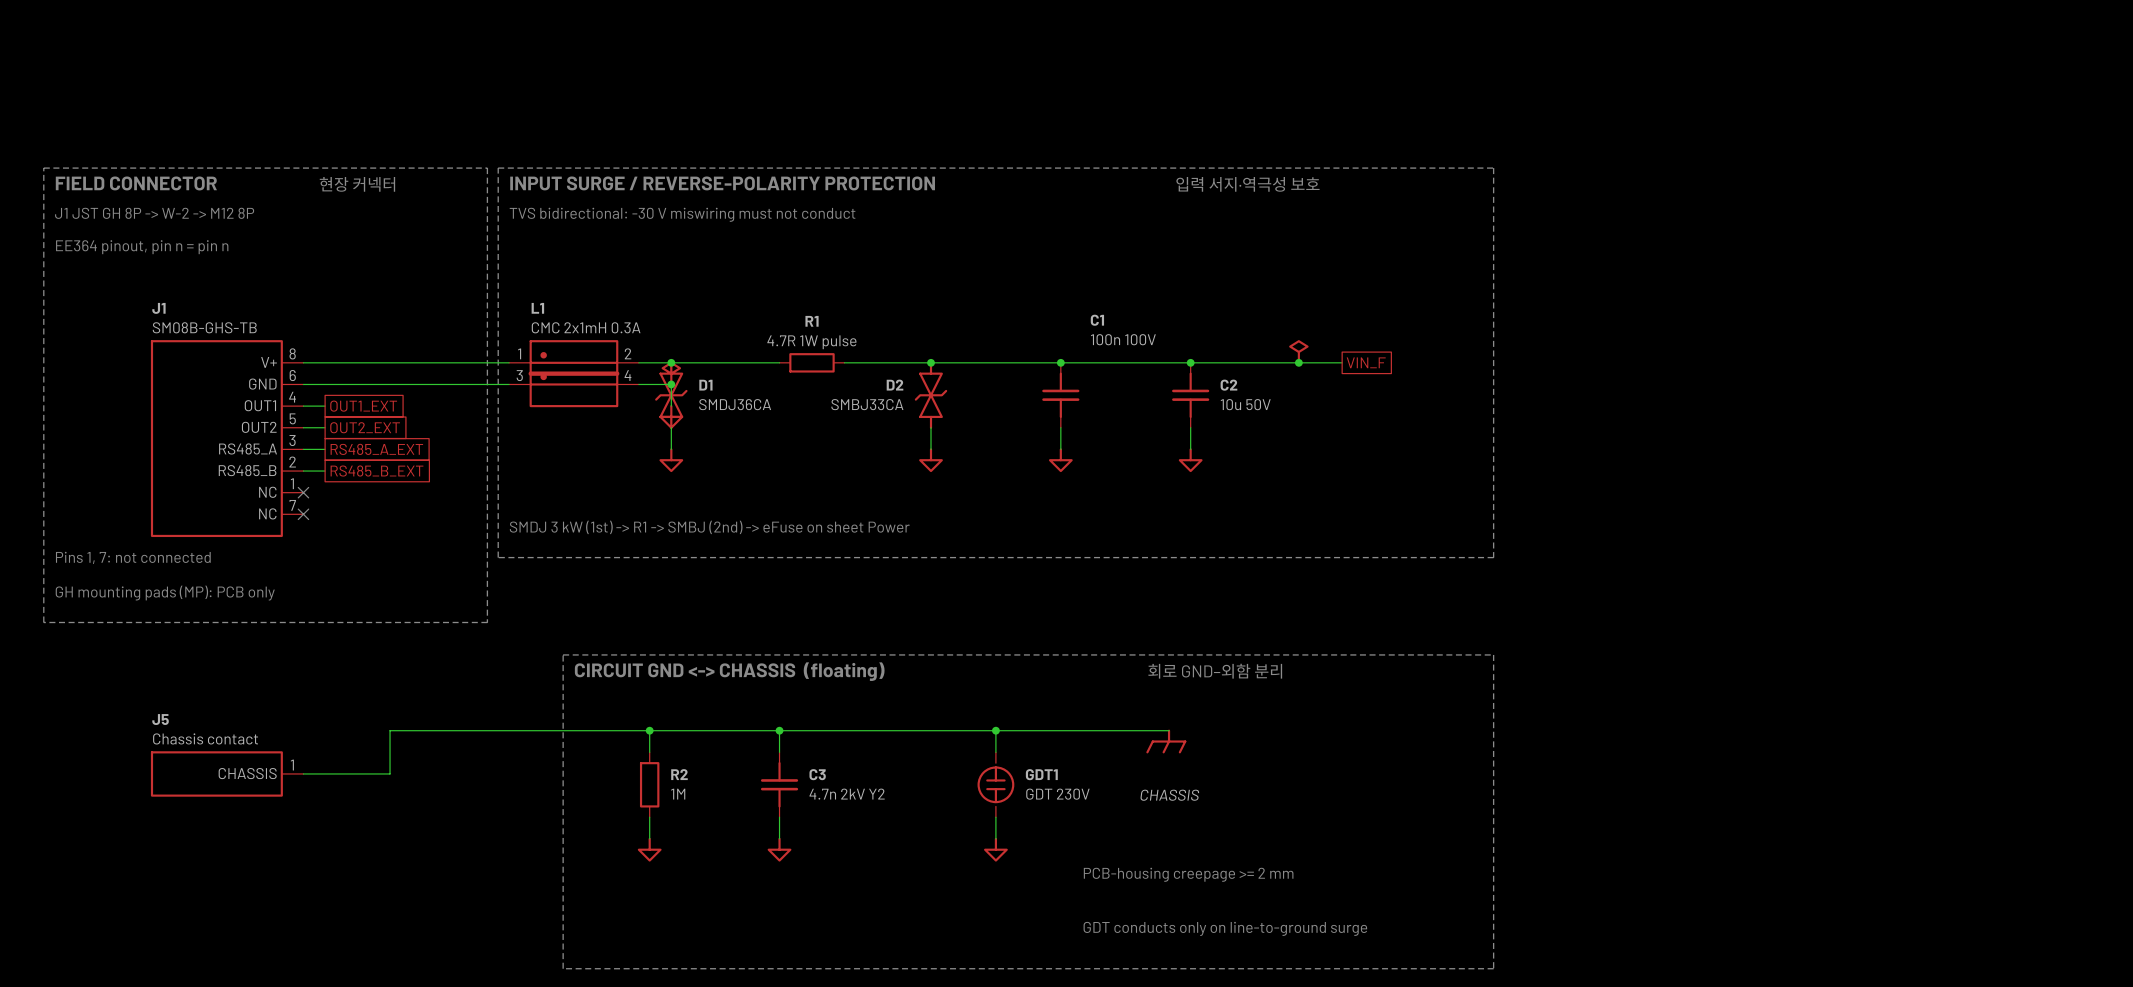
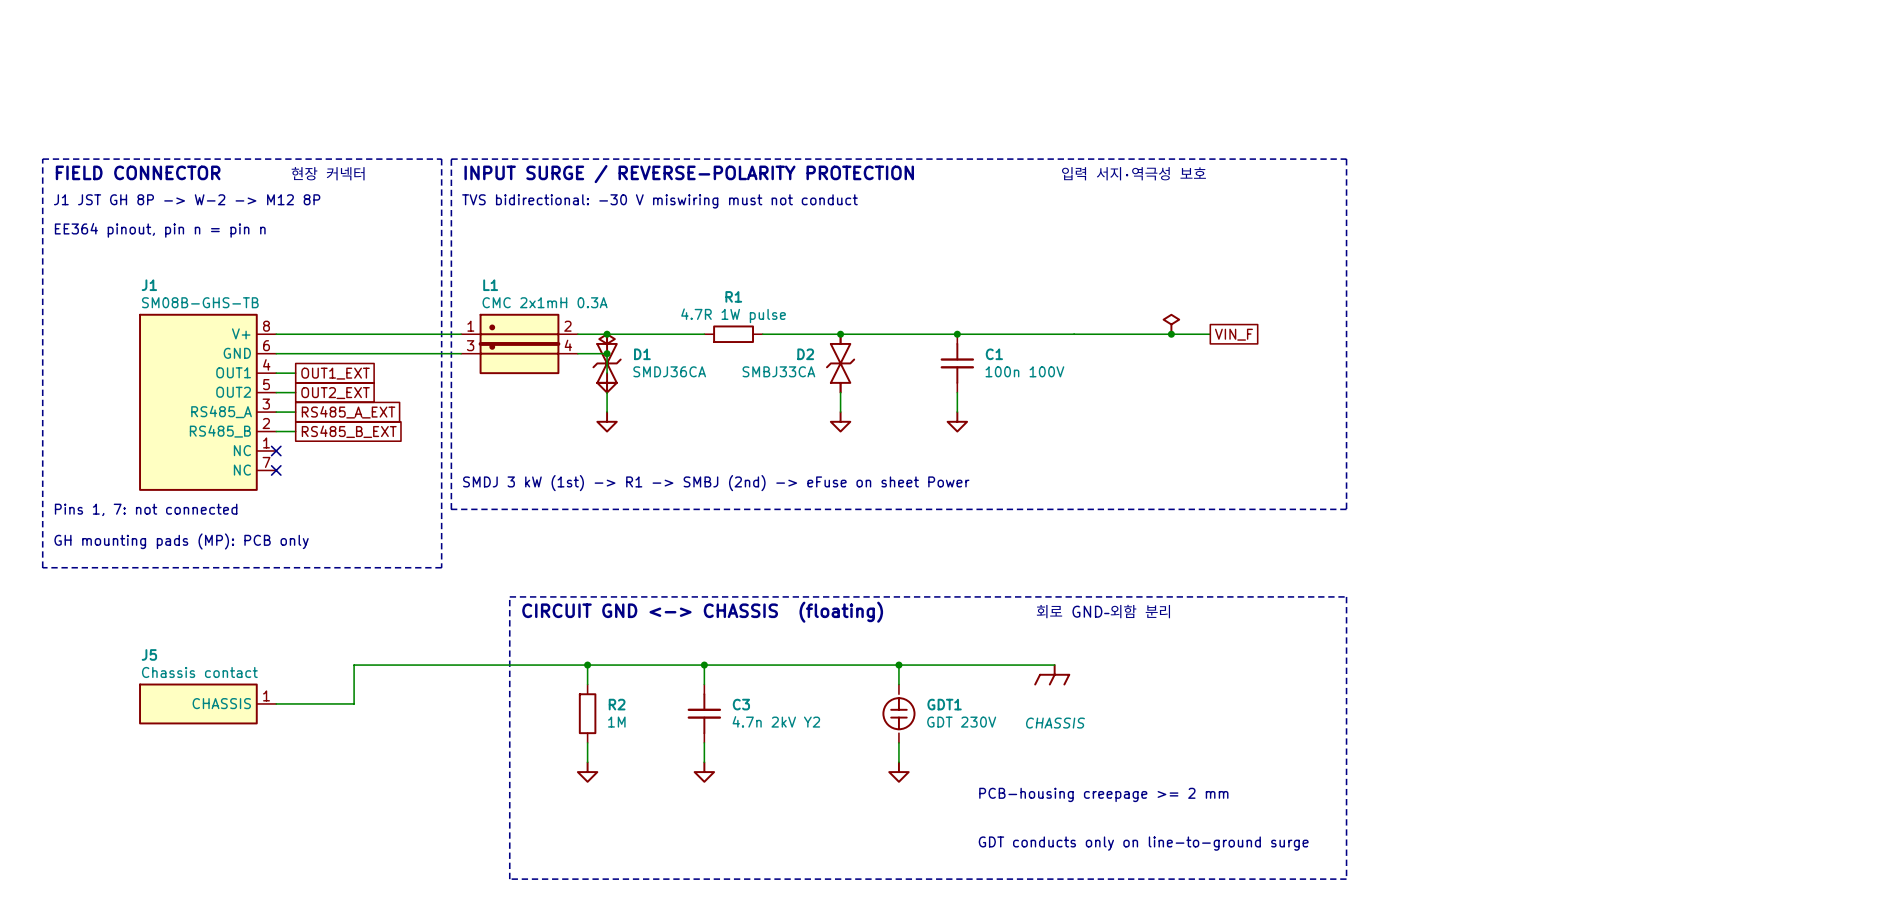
C1 name position: C1 (1097, 320) -> C1 (994, 354)
C1 value position: 100n 100V (1123, 339) -> 100n 100V (1024, 371)
junction: (1190, 362) -> none
C2: 10u 50V (1190, 395) -> none
wire: (1190, 427) (1190, 449) -> none
power symbol: (1190, 460) -> none

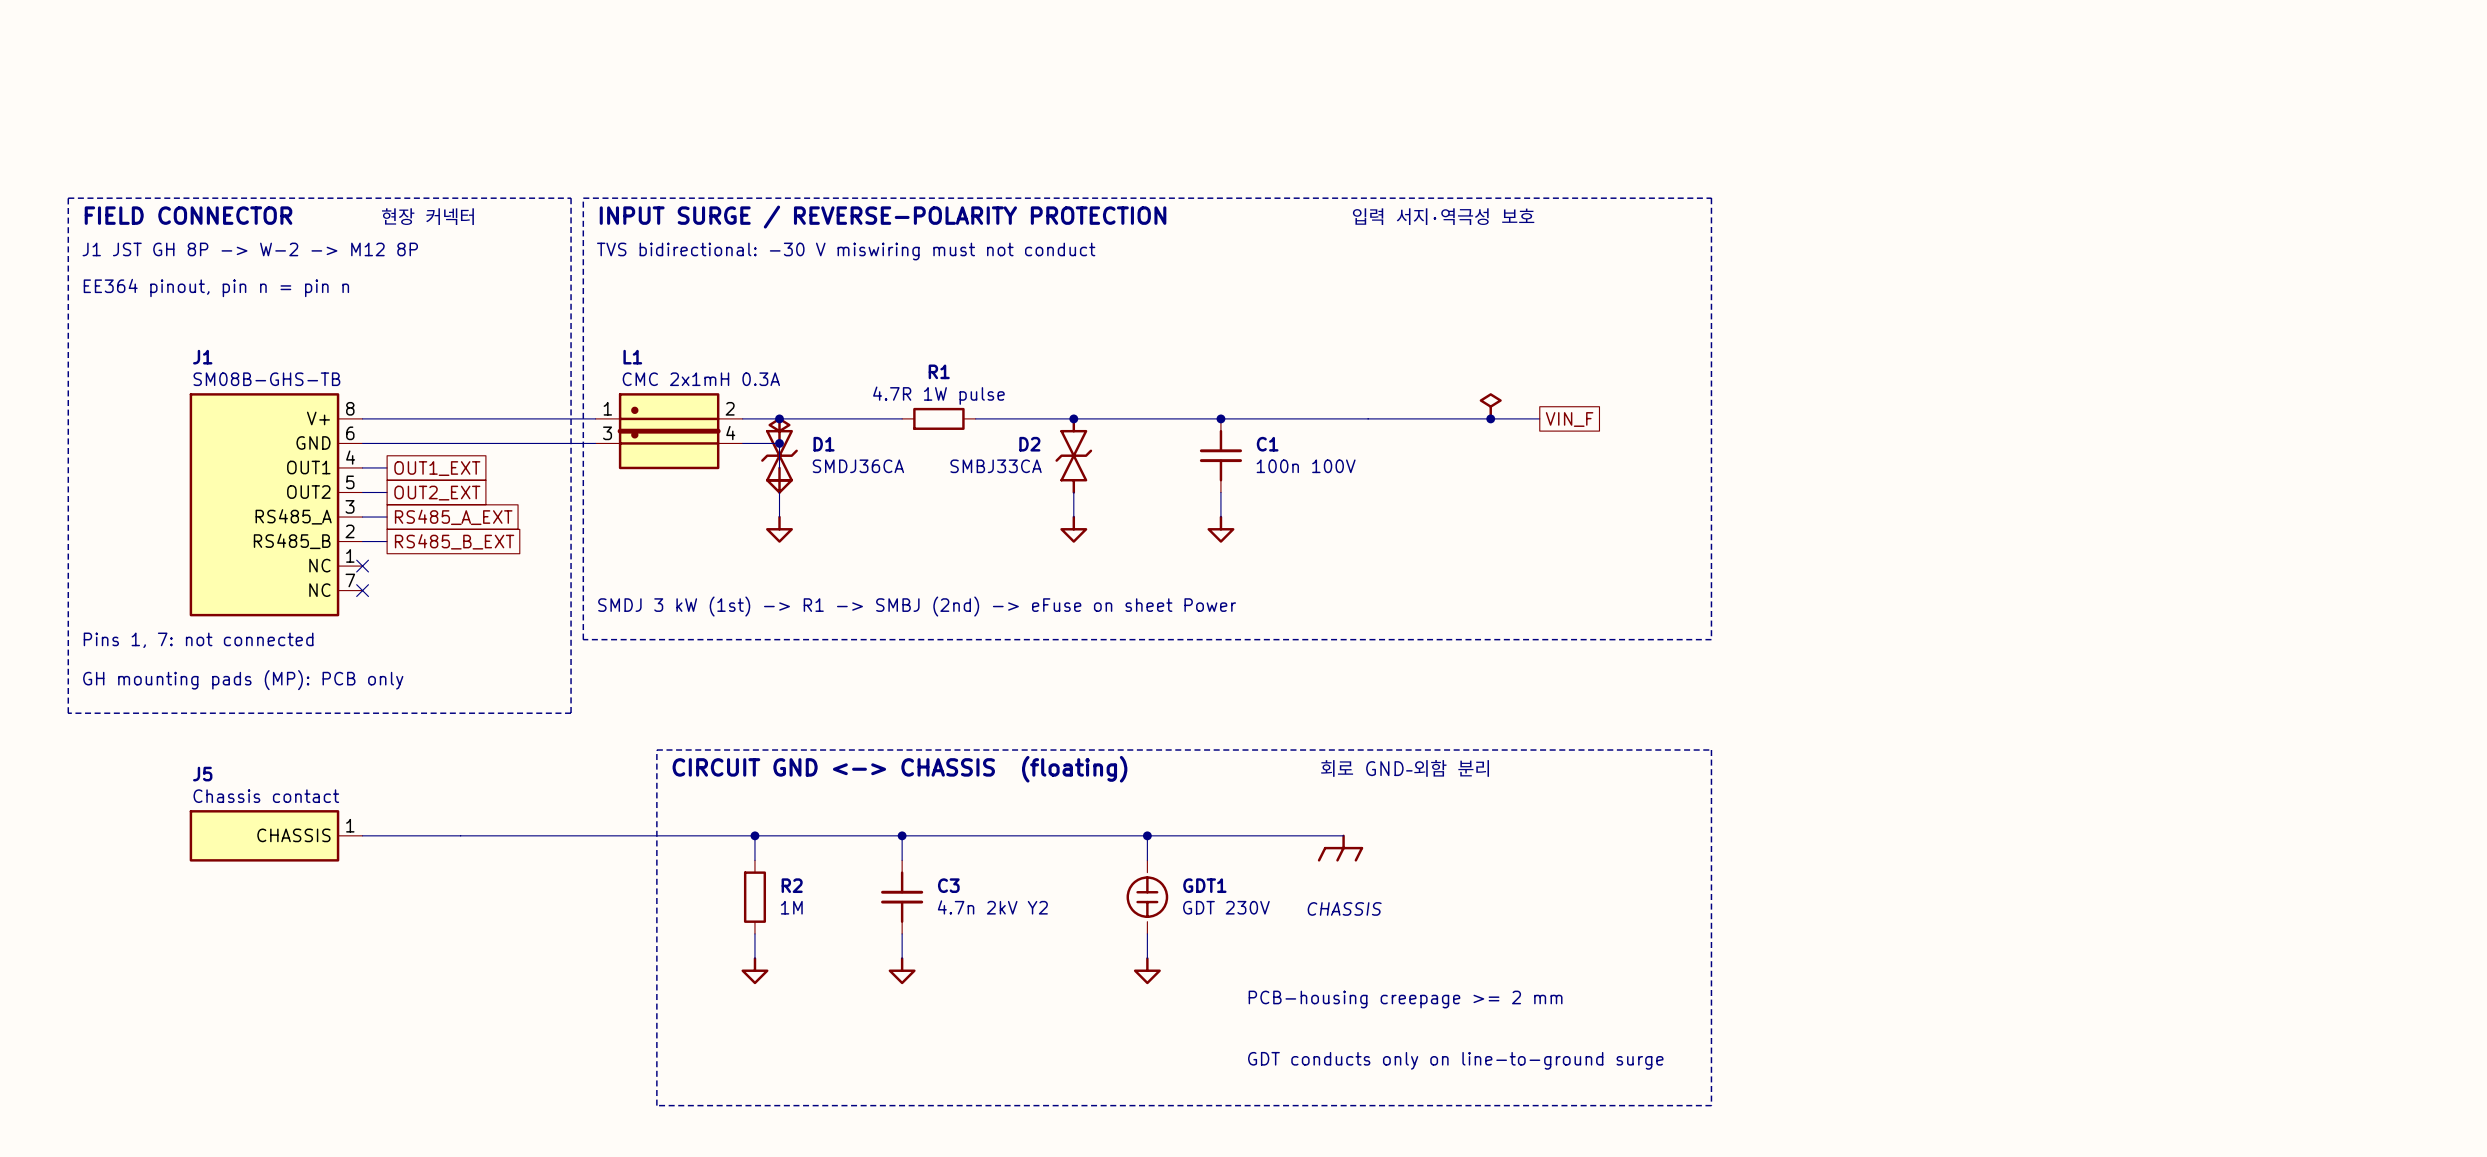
wire: (354, 665) (354, 703) (276, 703) -> (460, 835) (362, 835)
J5 position: (207, 703) -> (276, 835)

